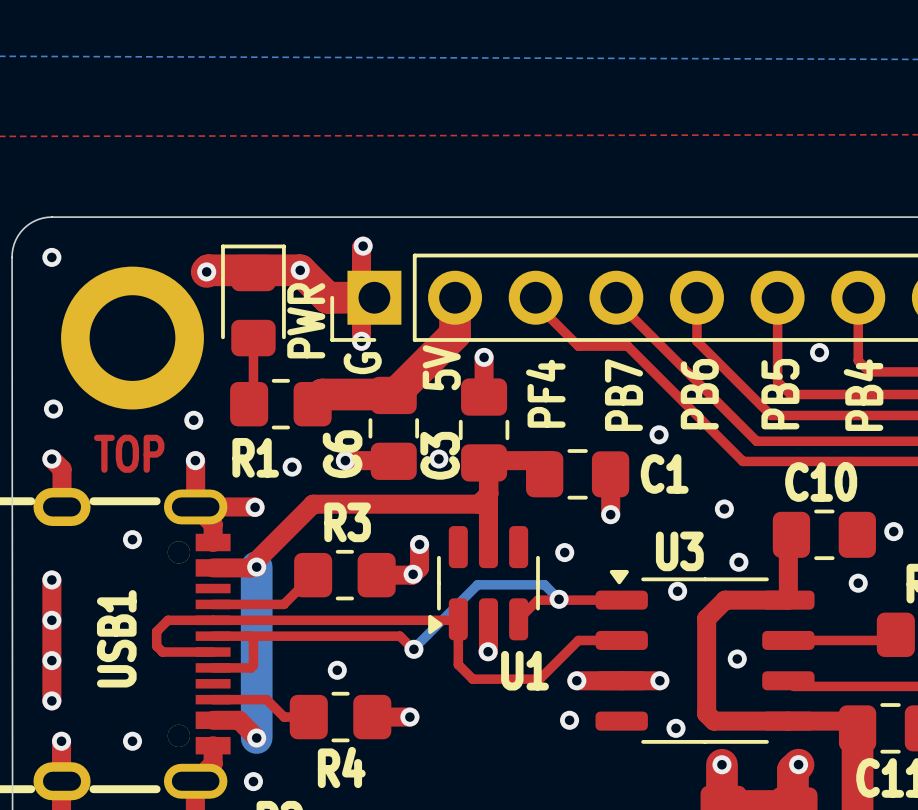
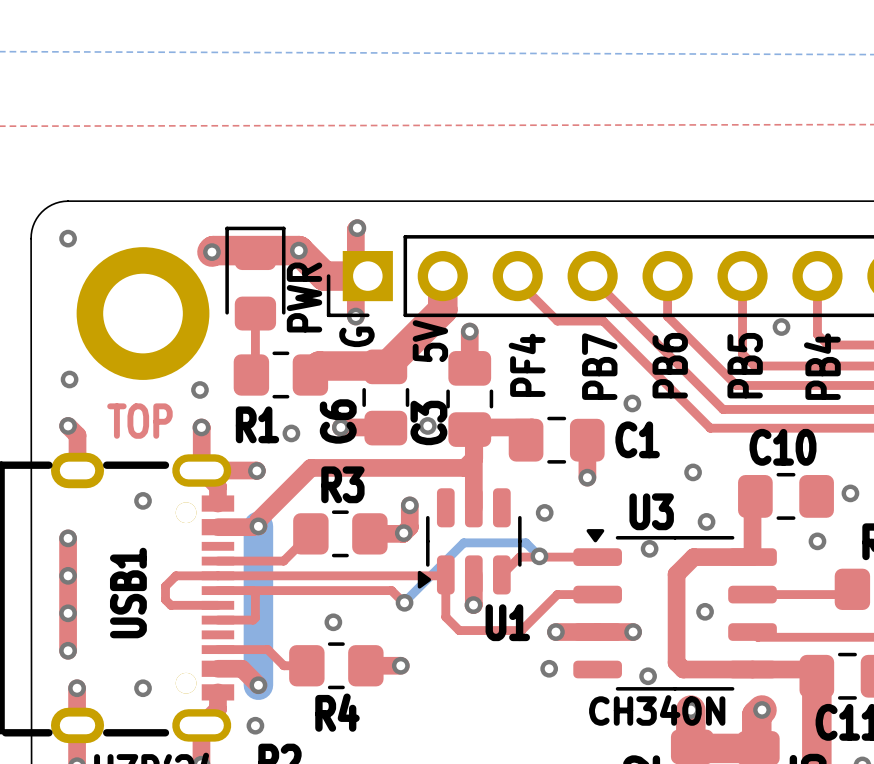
text: none -> CH340N (657, 710)

